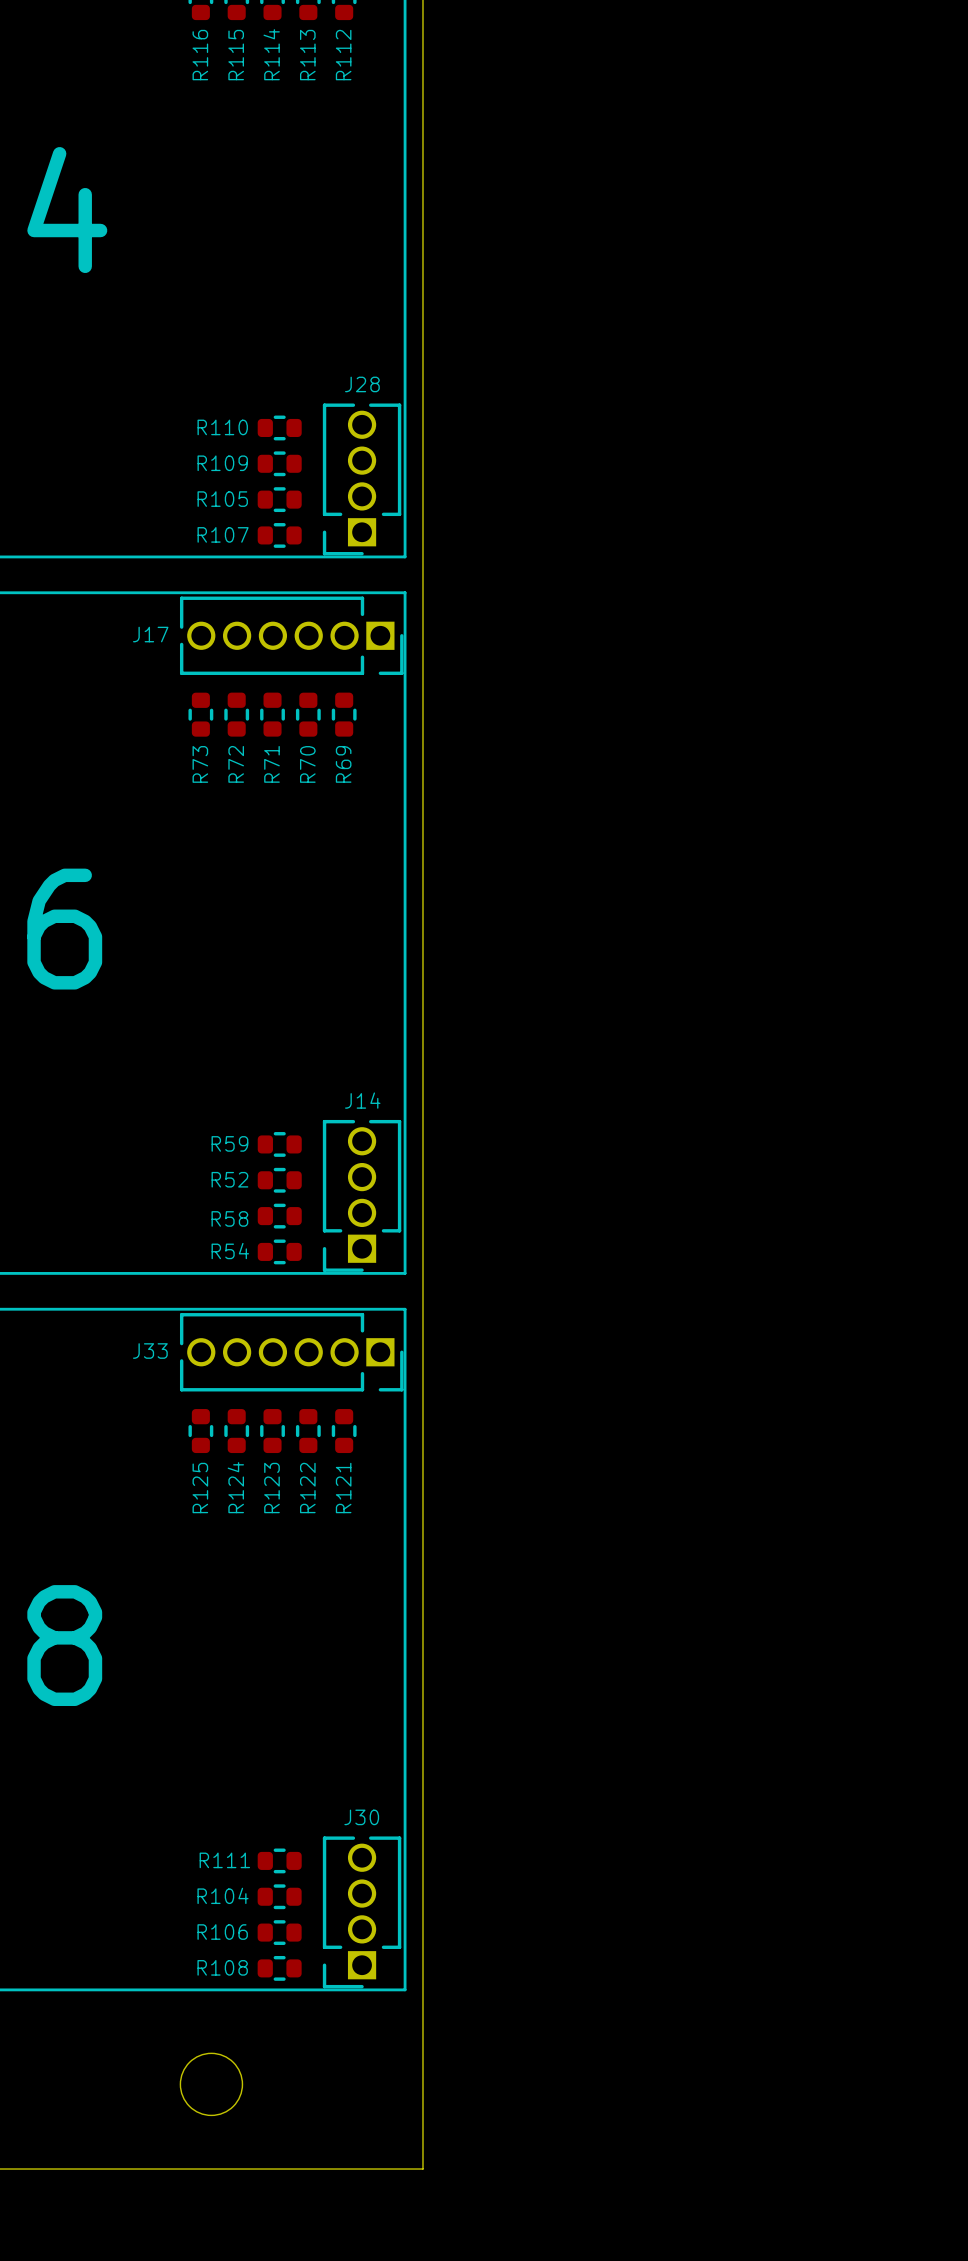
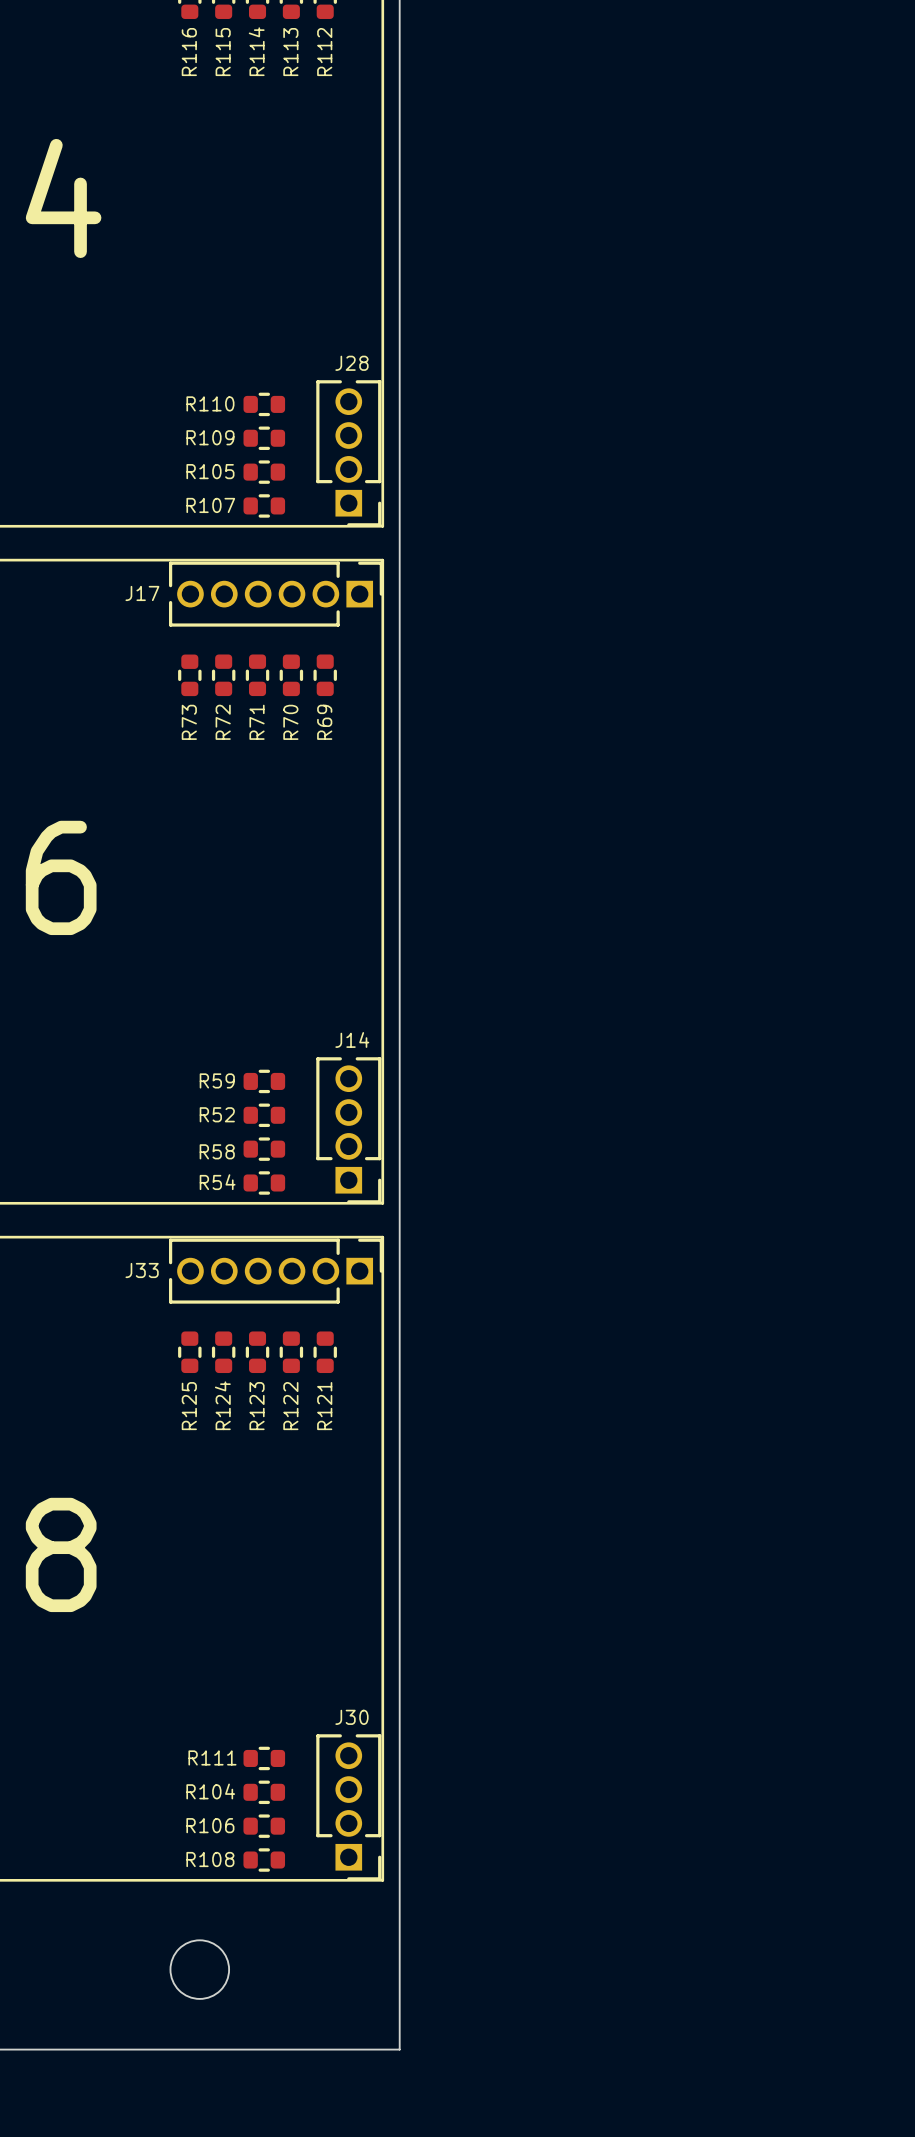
J28 footprint: [322, 403, 402, 556] -> [316, 380, 382, 527]
J17 footprint: [179, 596, 404, 675] -> [169, 561, 383, 627]
J14 footprint: [322, 1119, 402, 1272] -> [316, 1057, 382, 1204]
J33 footprint: [179, 1313, 404, 1392] -> [169, 1238, 383, 1304]
J30 footprint: [322, 1836, 402, 1989] -> [316, 1734, 382, 1881]

